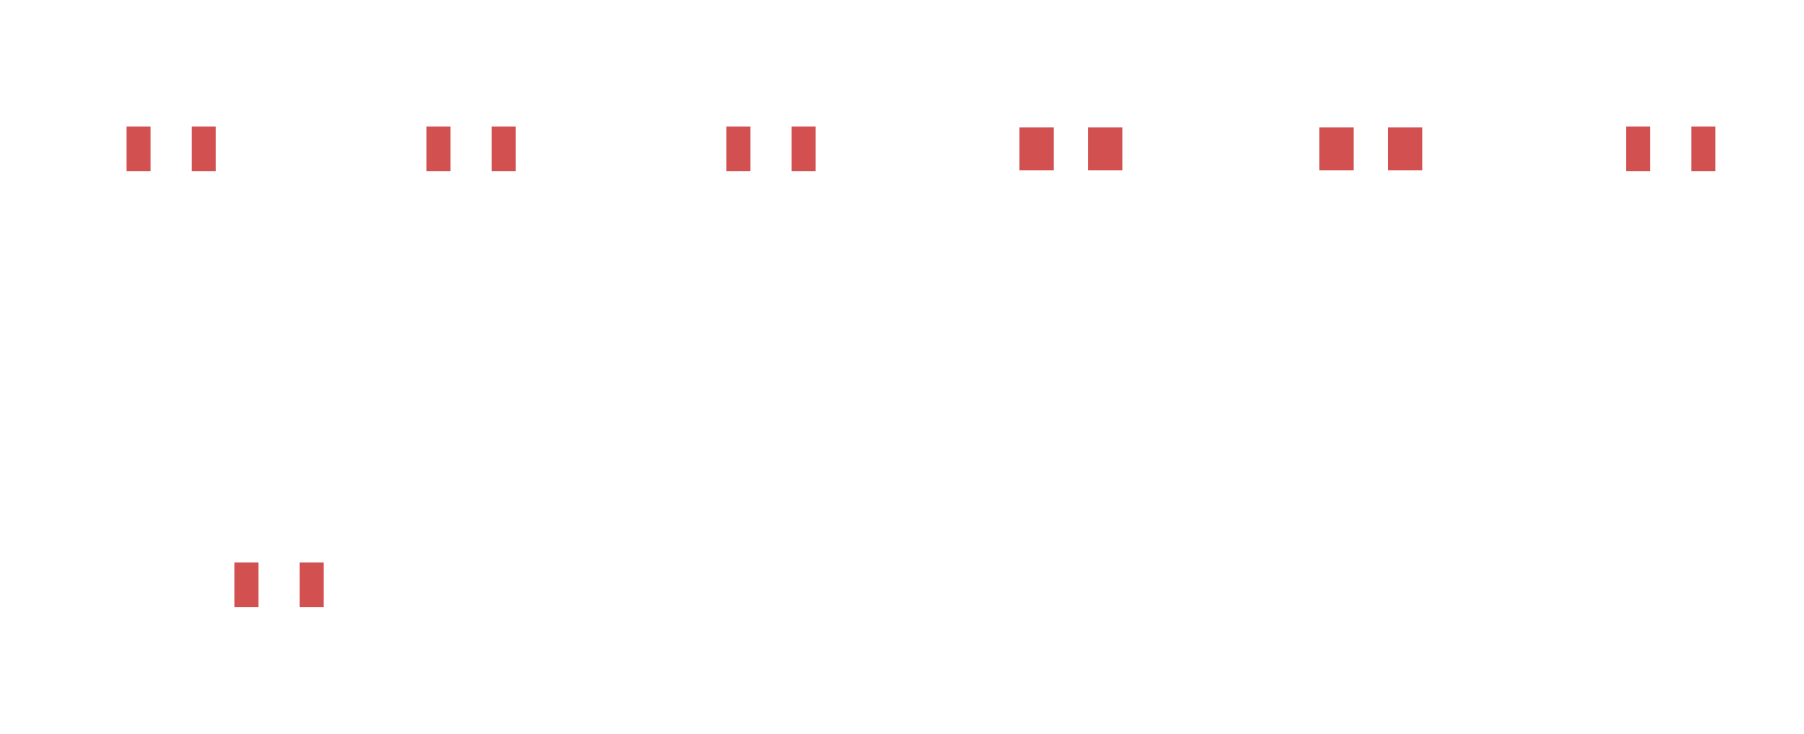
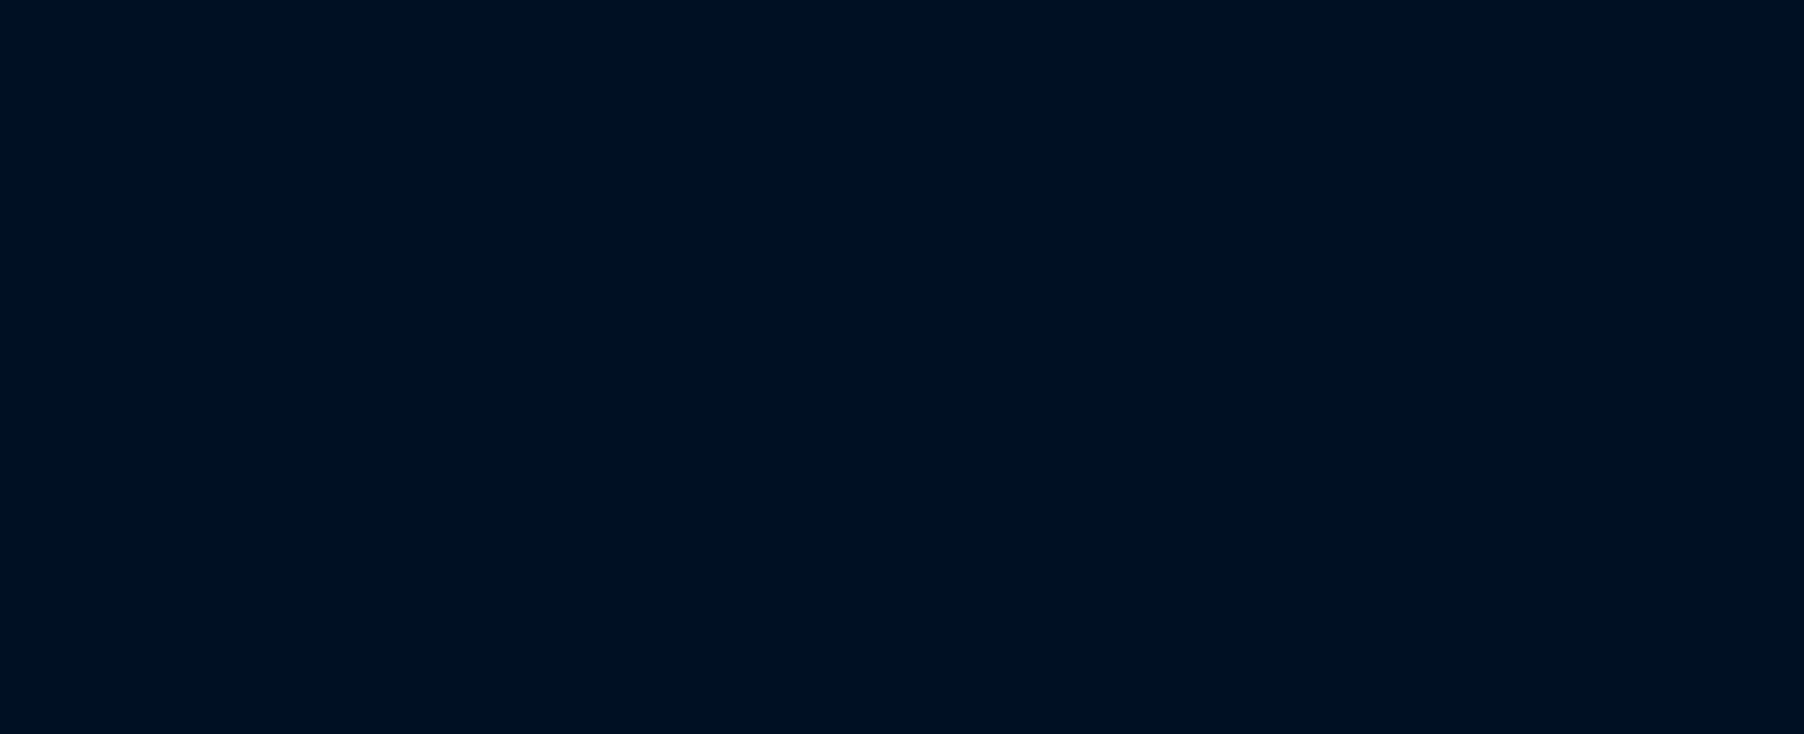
part: (171, 148) -> none
part: (471, 148) -> none
part: (770, 148) -> none
part: (1070, 148) -> none
part: (1370, 148) -> none
part: (1670, 148) -> none
part: (279, 584) -> none

